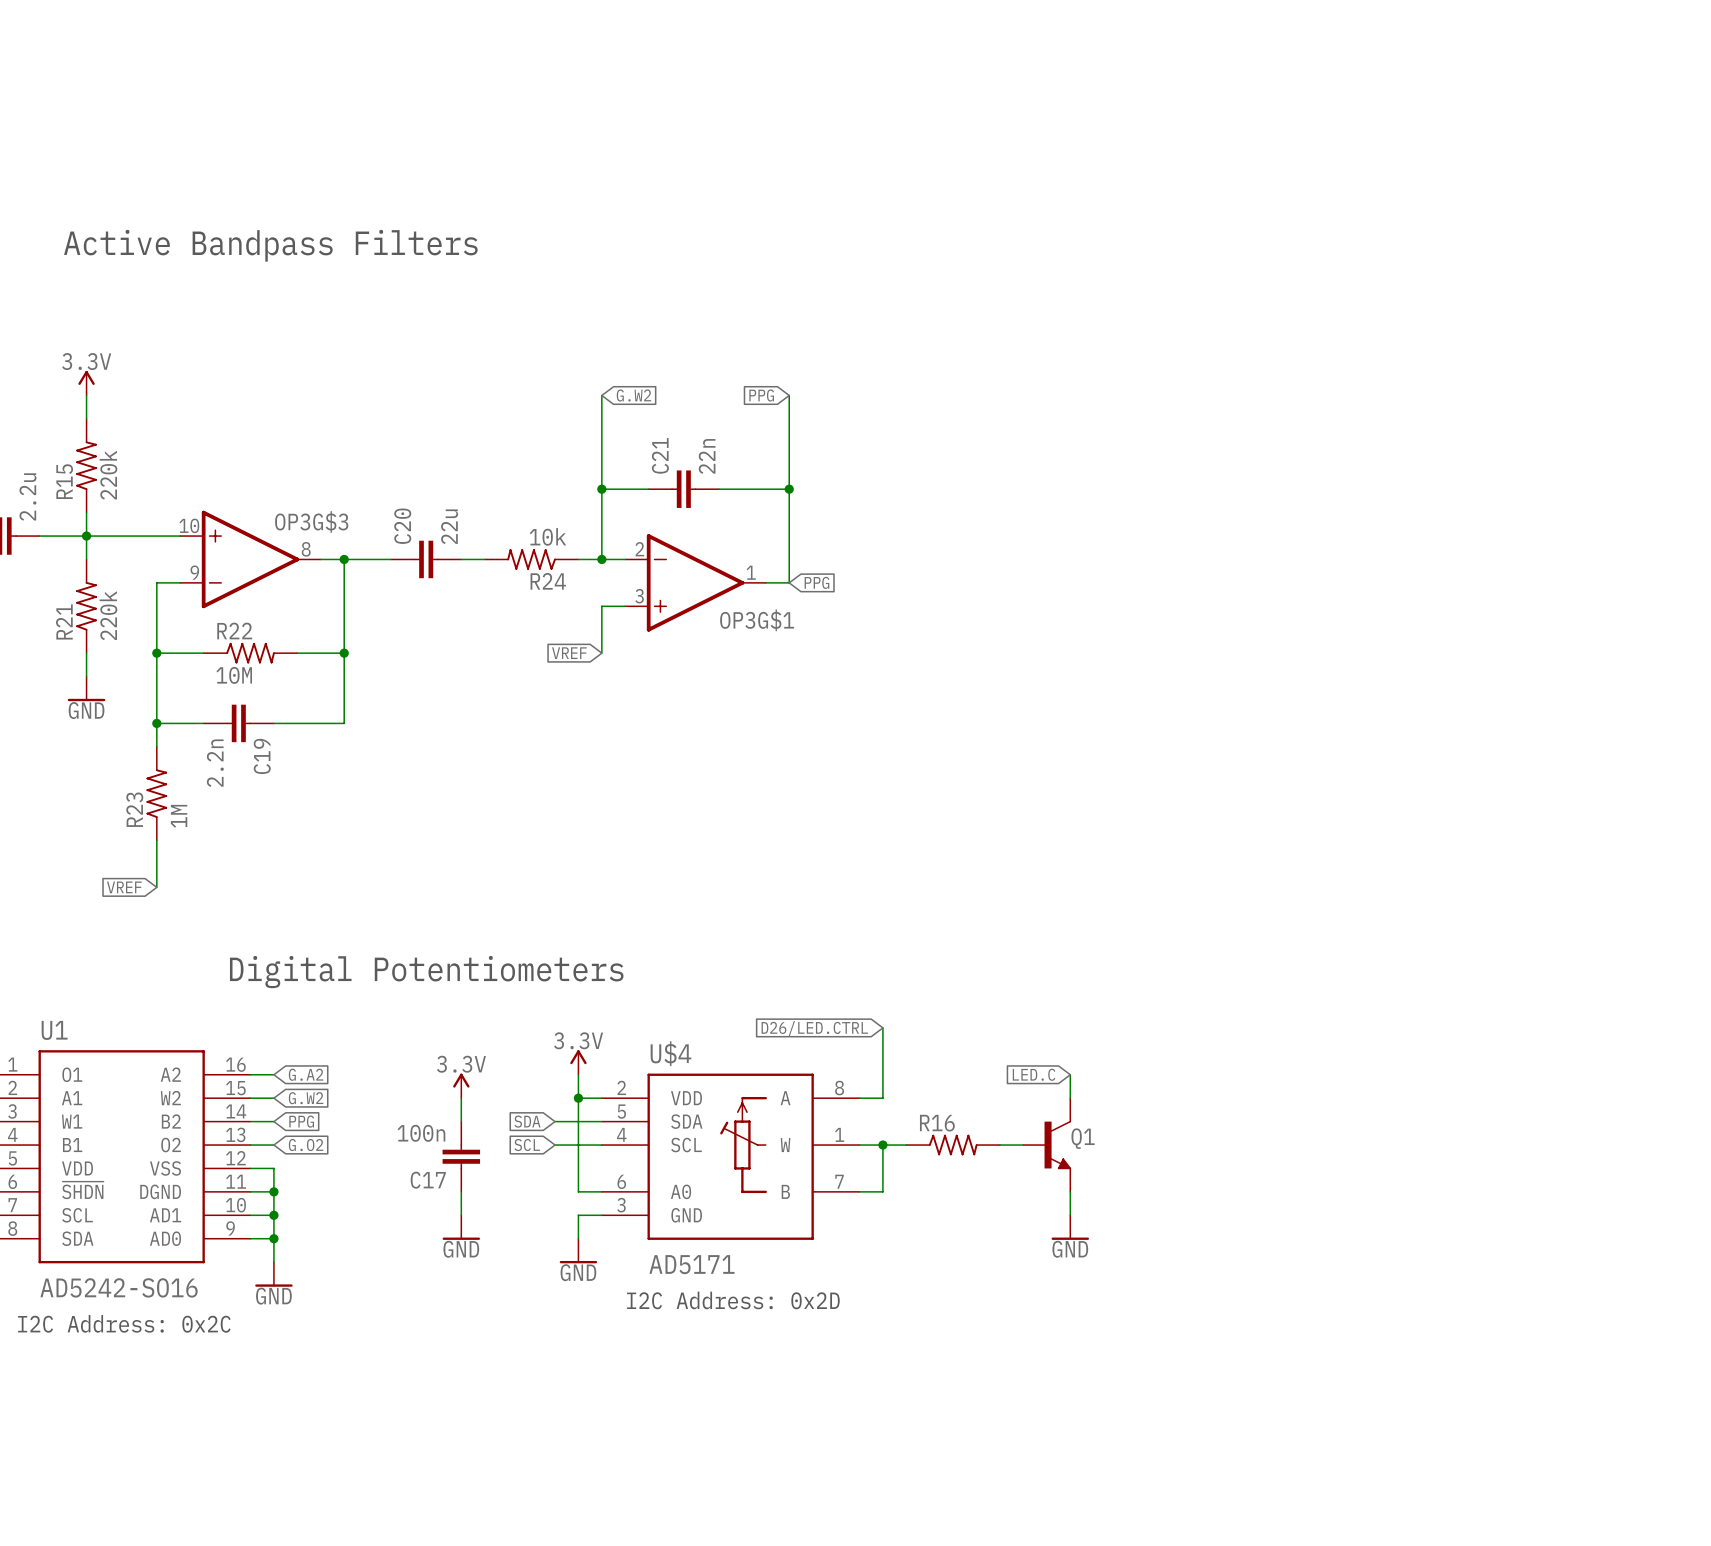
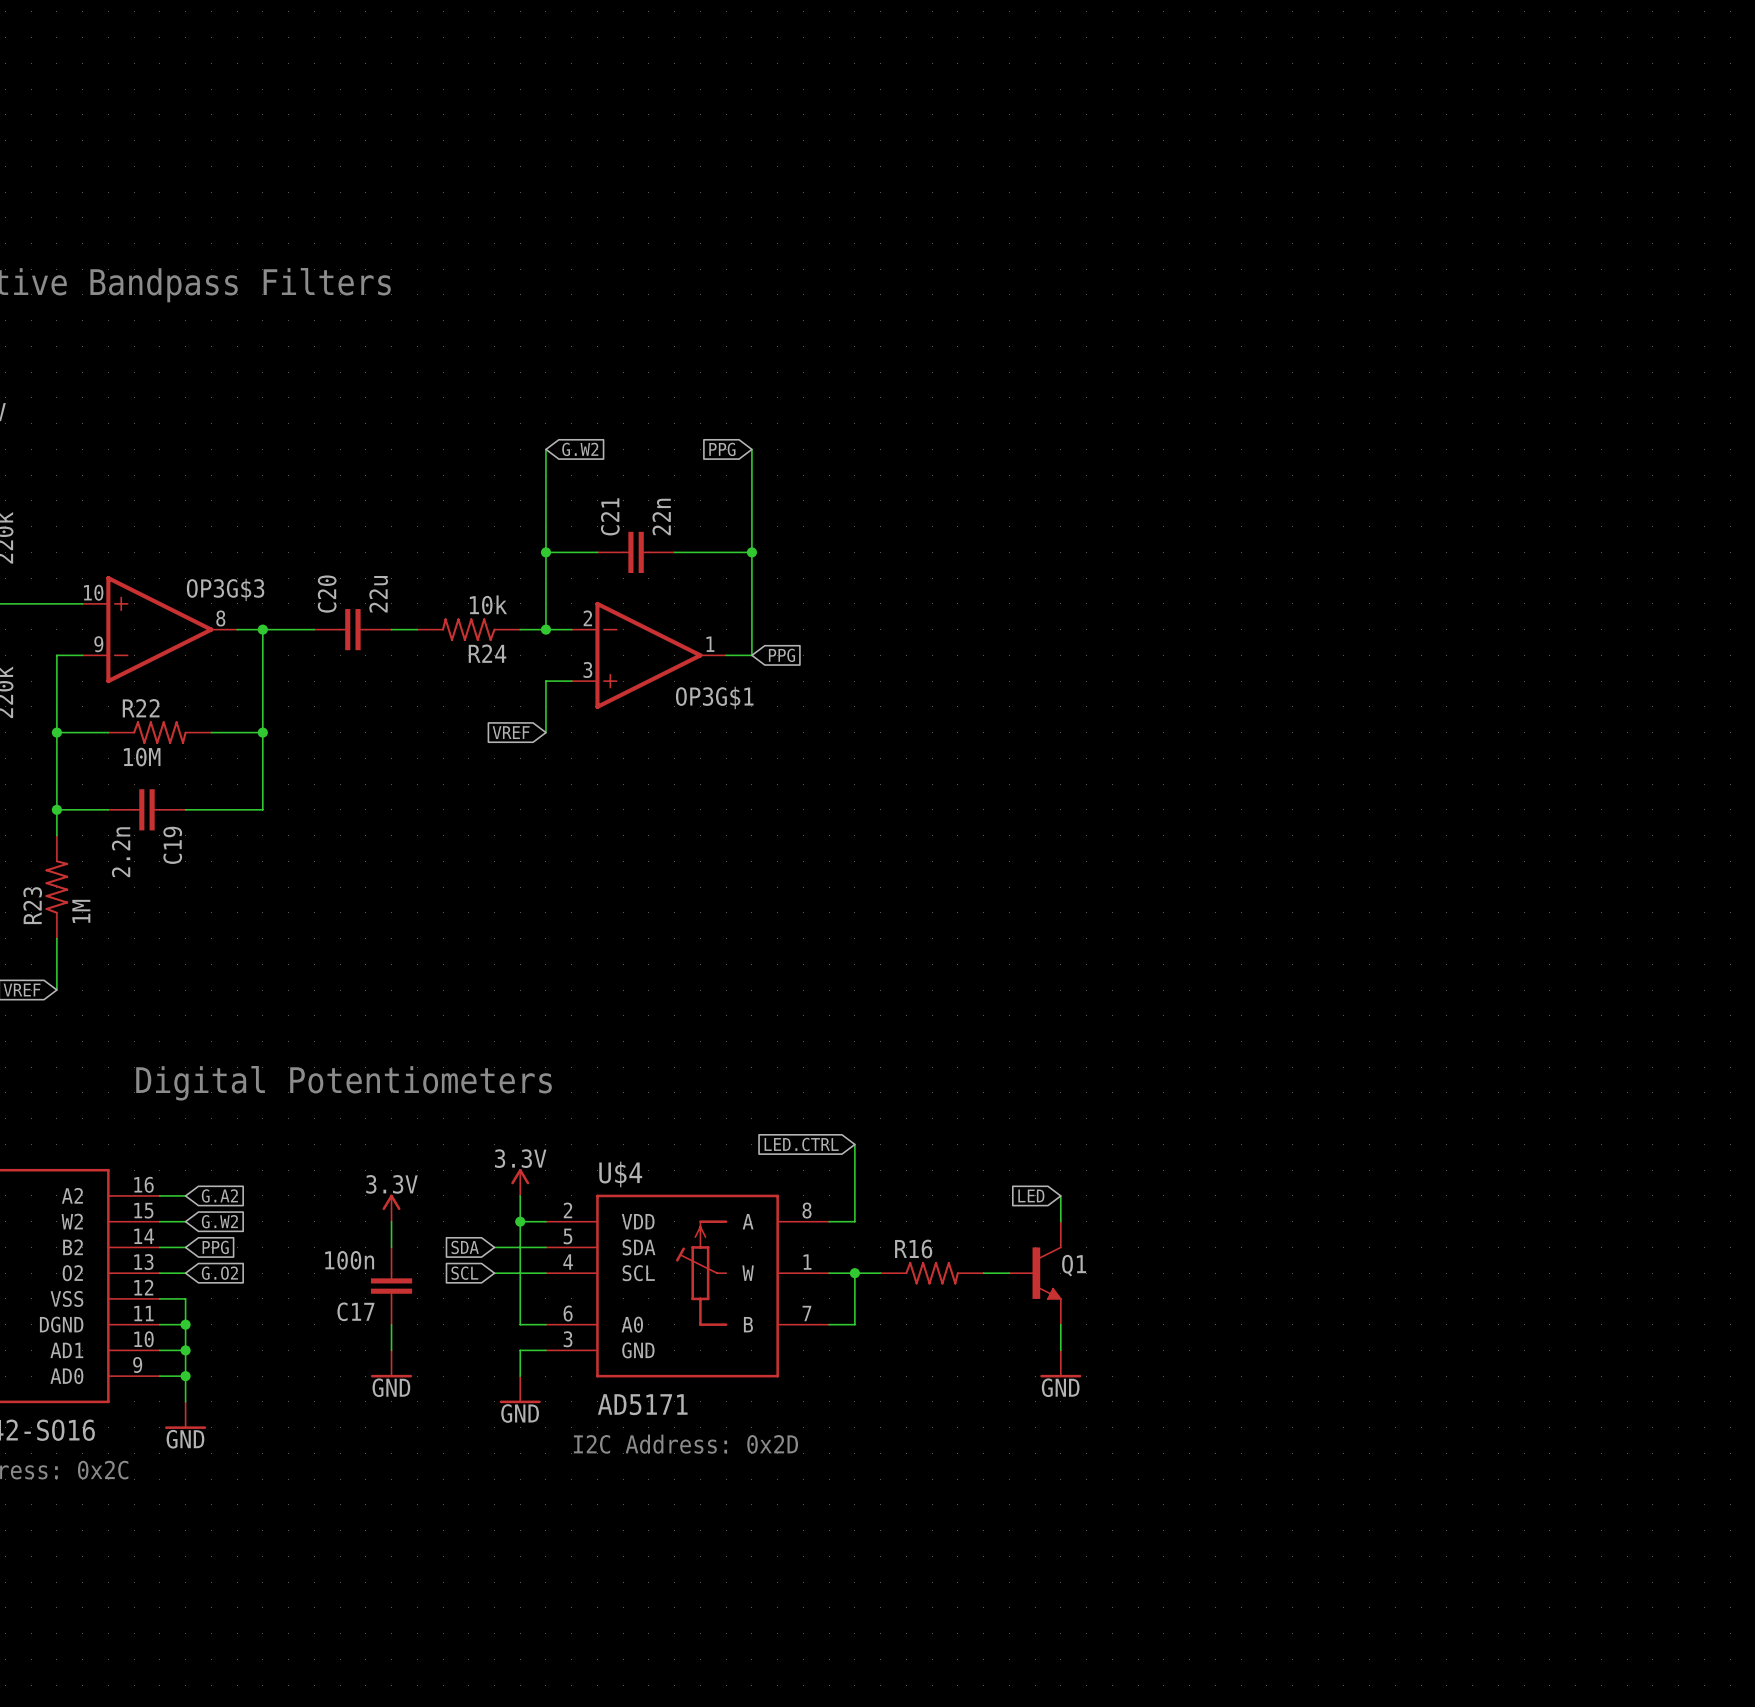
global label: D26/LED.CTRL (814, 1028) -> LED.CTRL (801, 1144)
global label: LED.C (1034, 1074) -> LED (1031, 1195)

